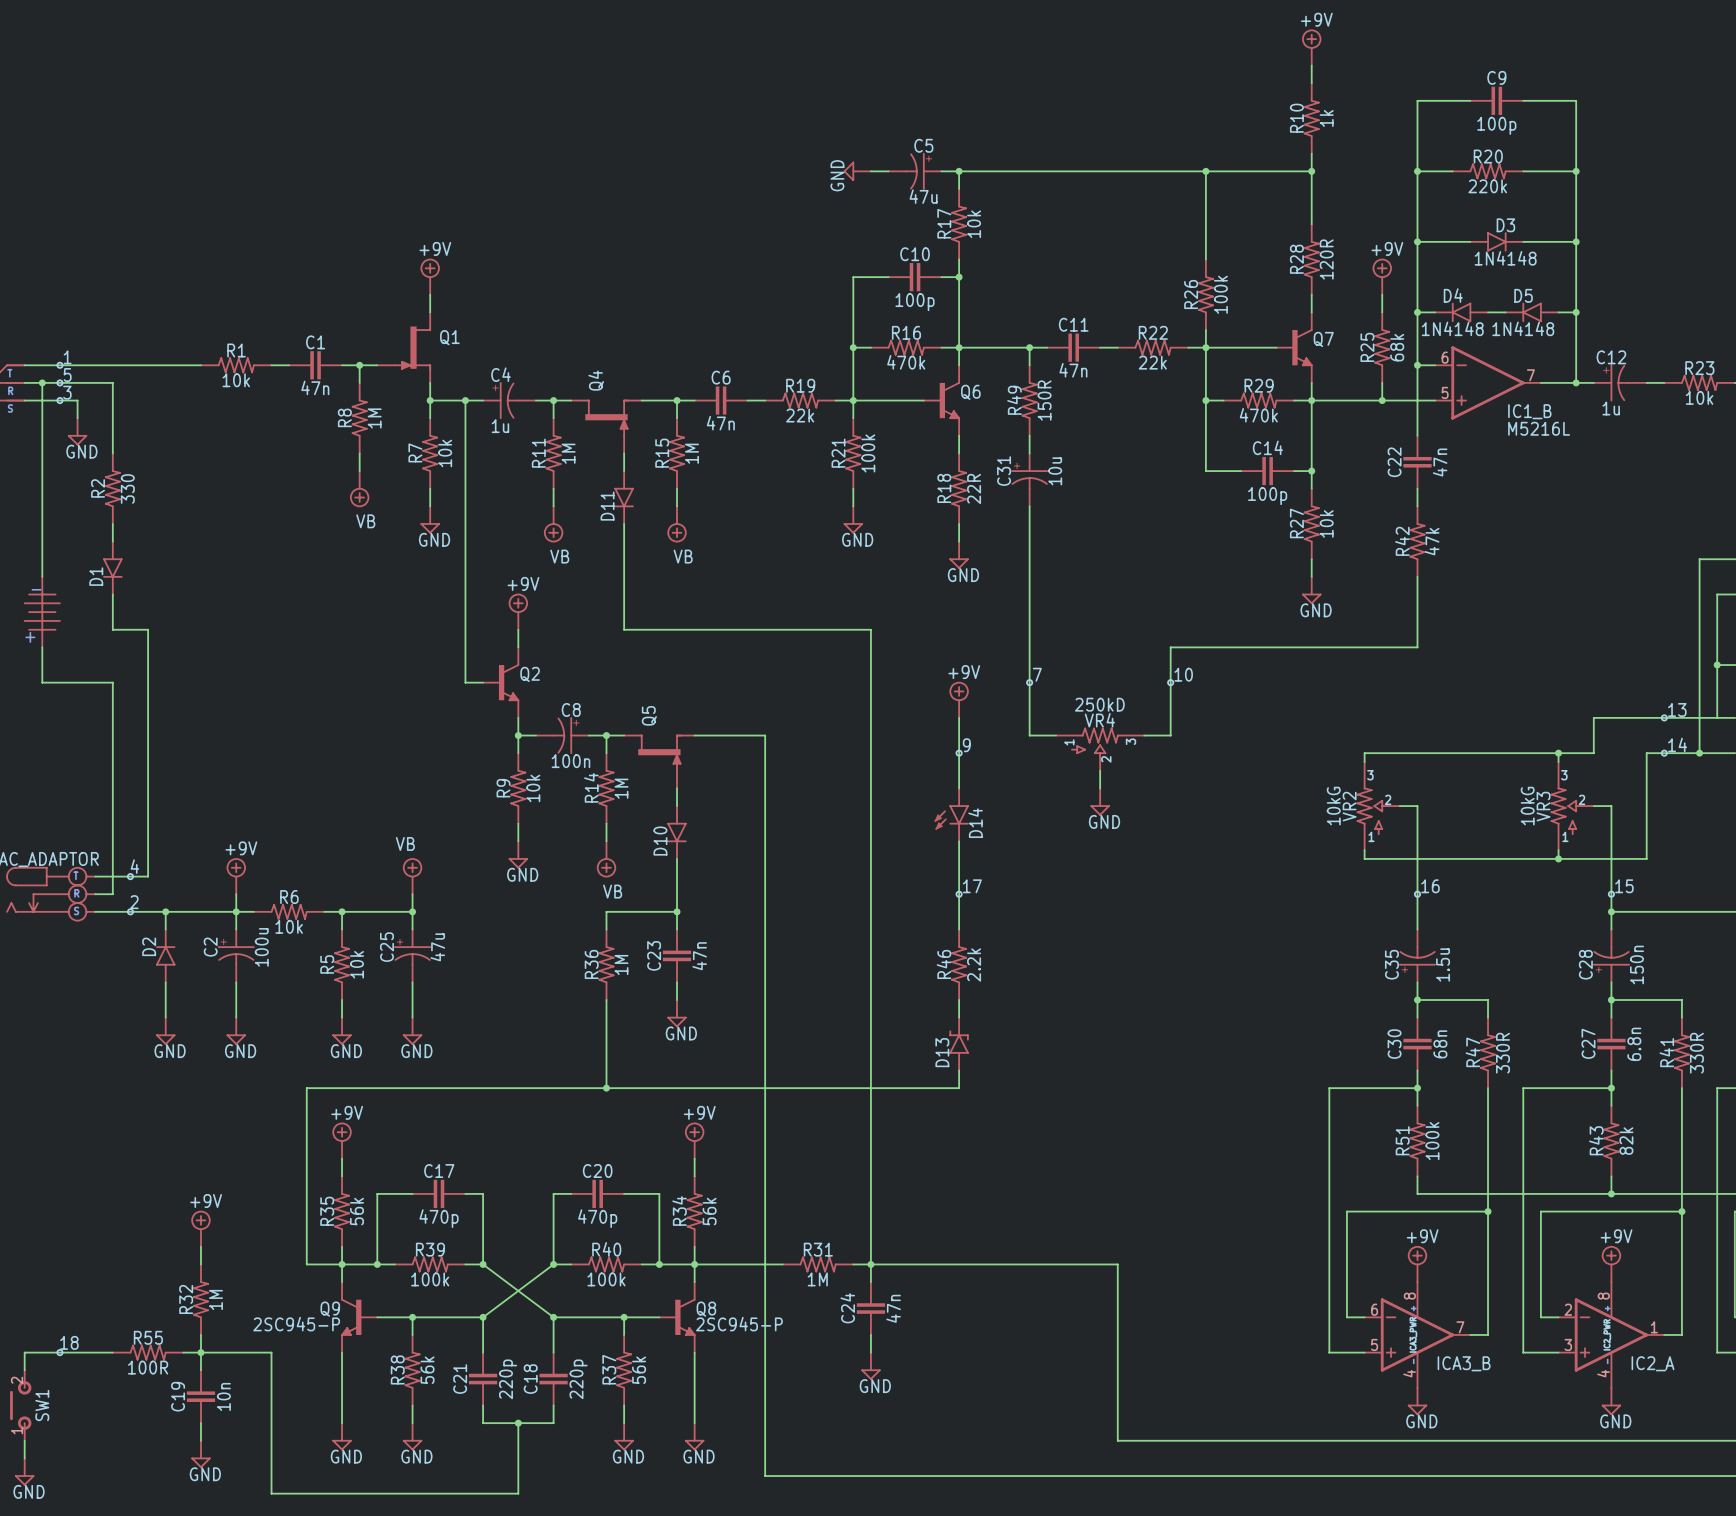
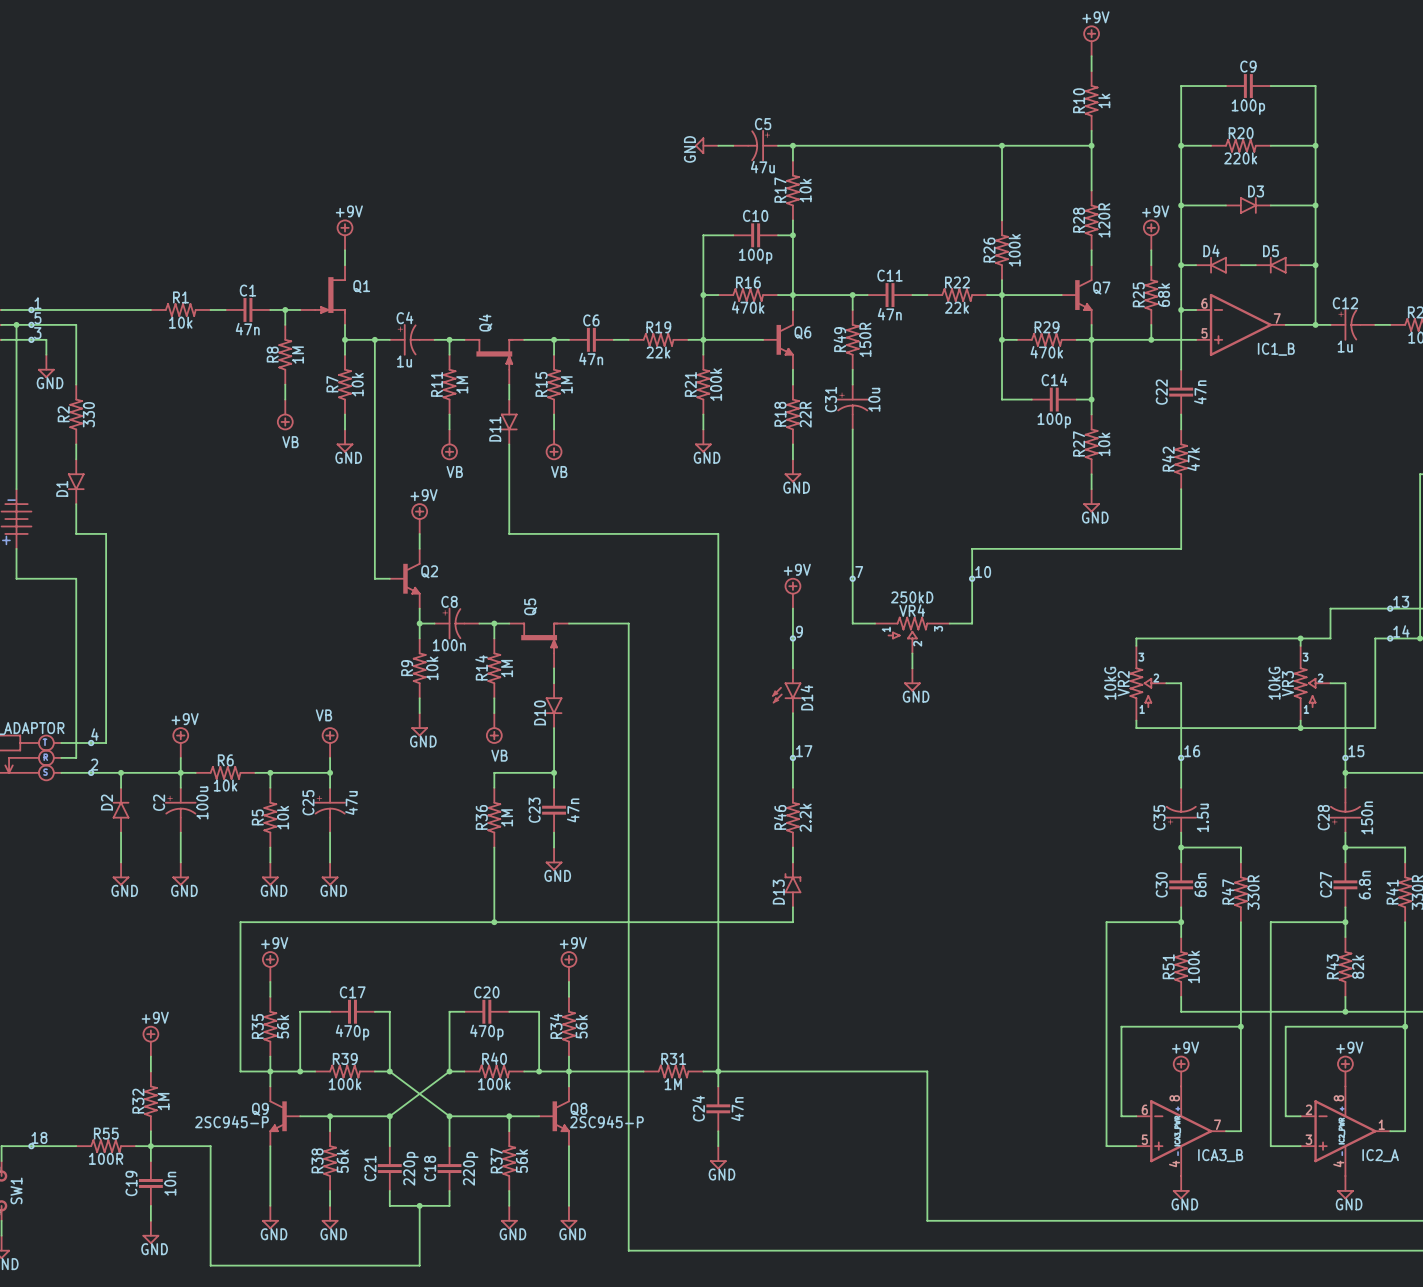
D3 value: 1N4148 (1505, 258) -> none
D4 value: 1N4148 (1452, 328) -> none
D5 value: 1N4148 (1523, 328) -> none
IC1_B value: M5216L (1539, 428) -> none
C8 flip: as is (566, 735) -> left-right (453, 623)

